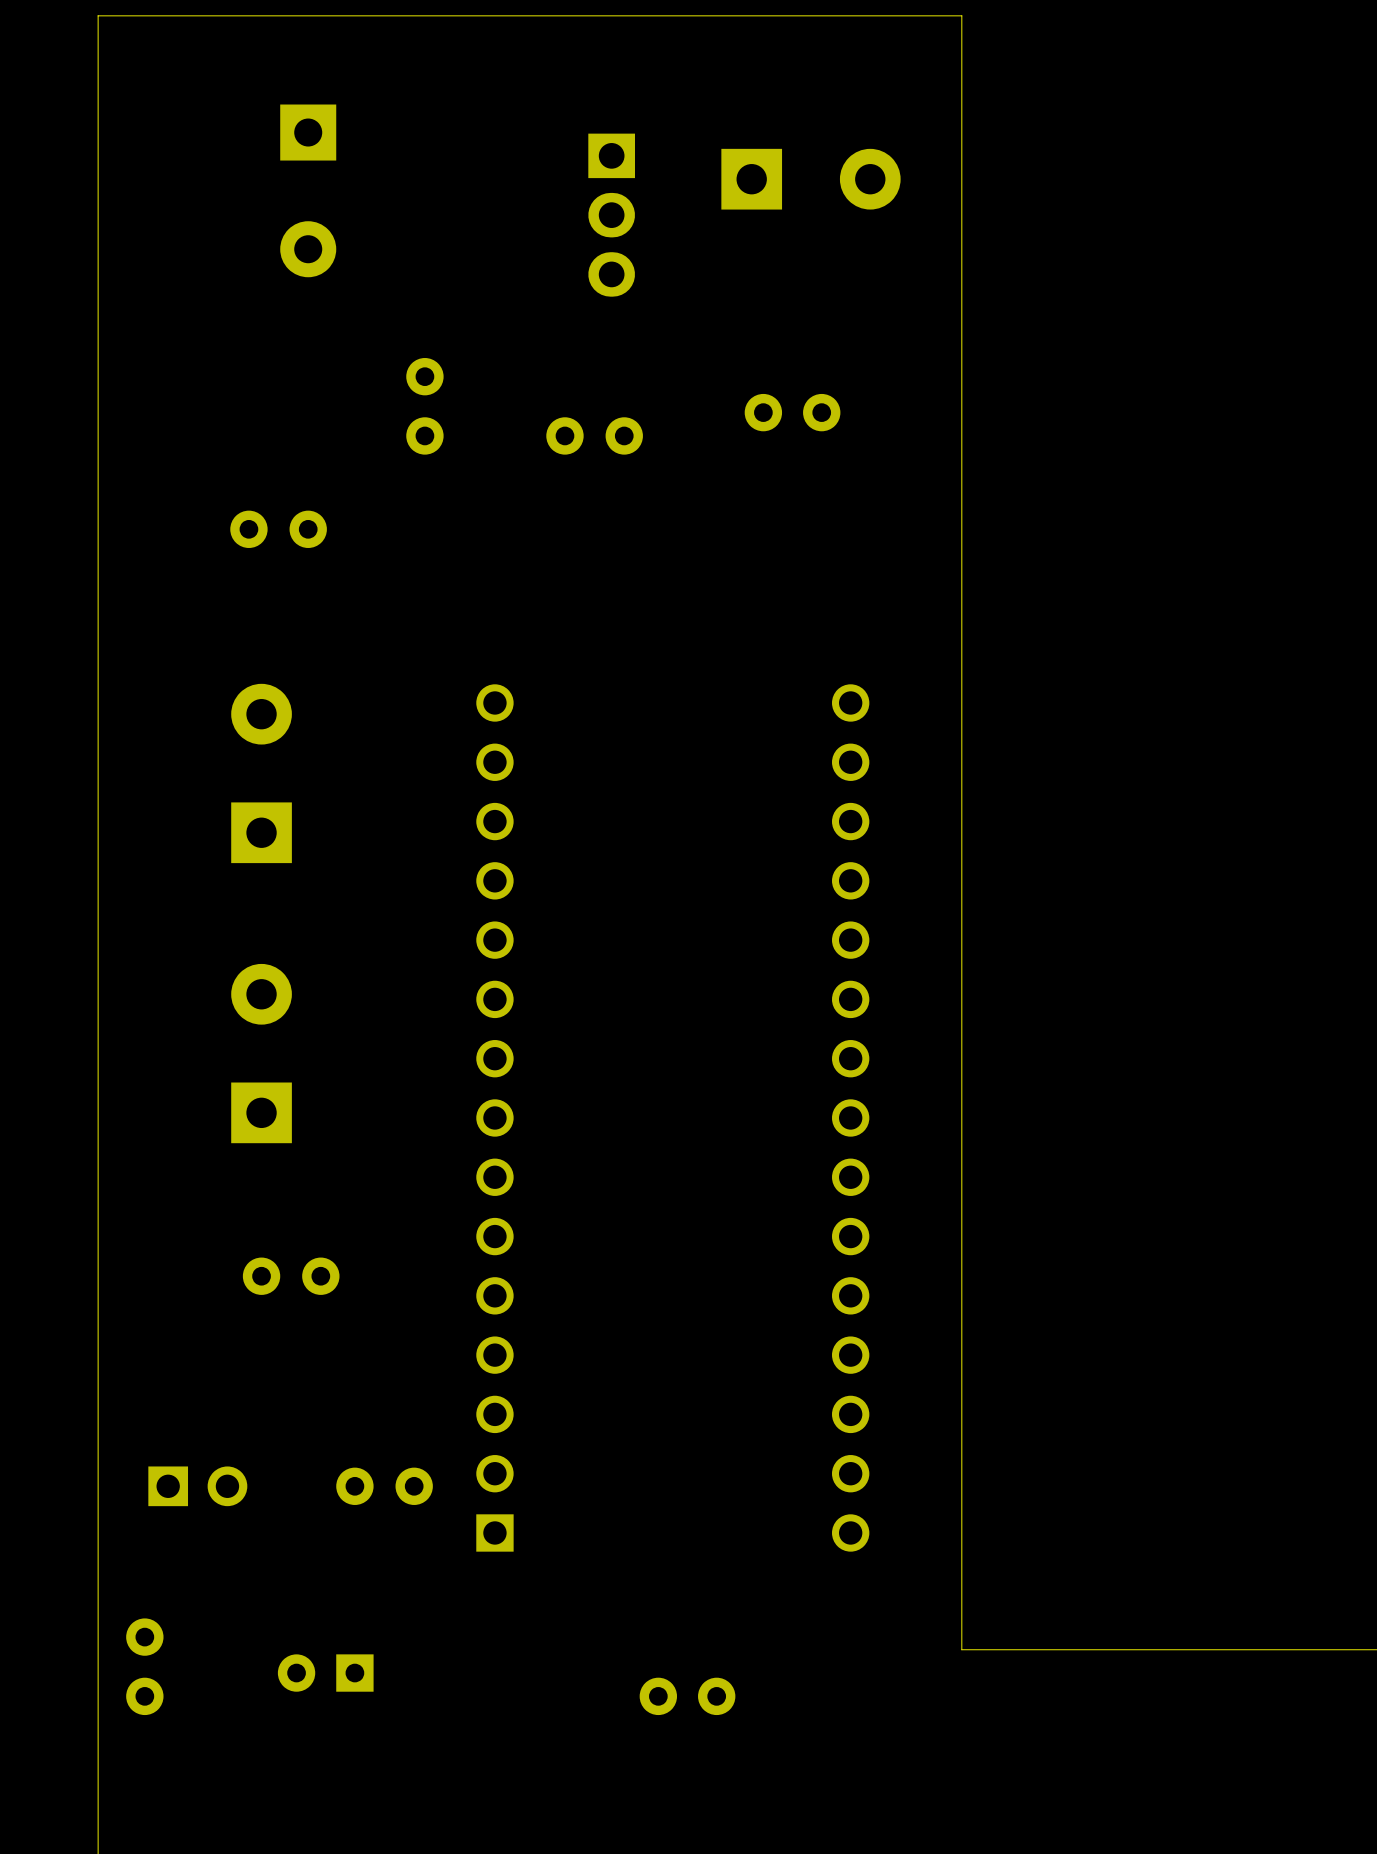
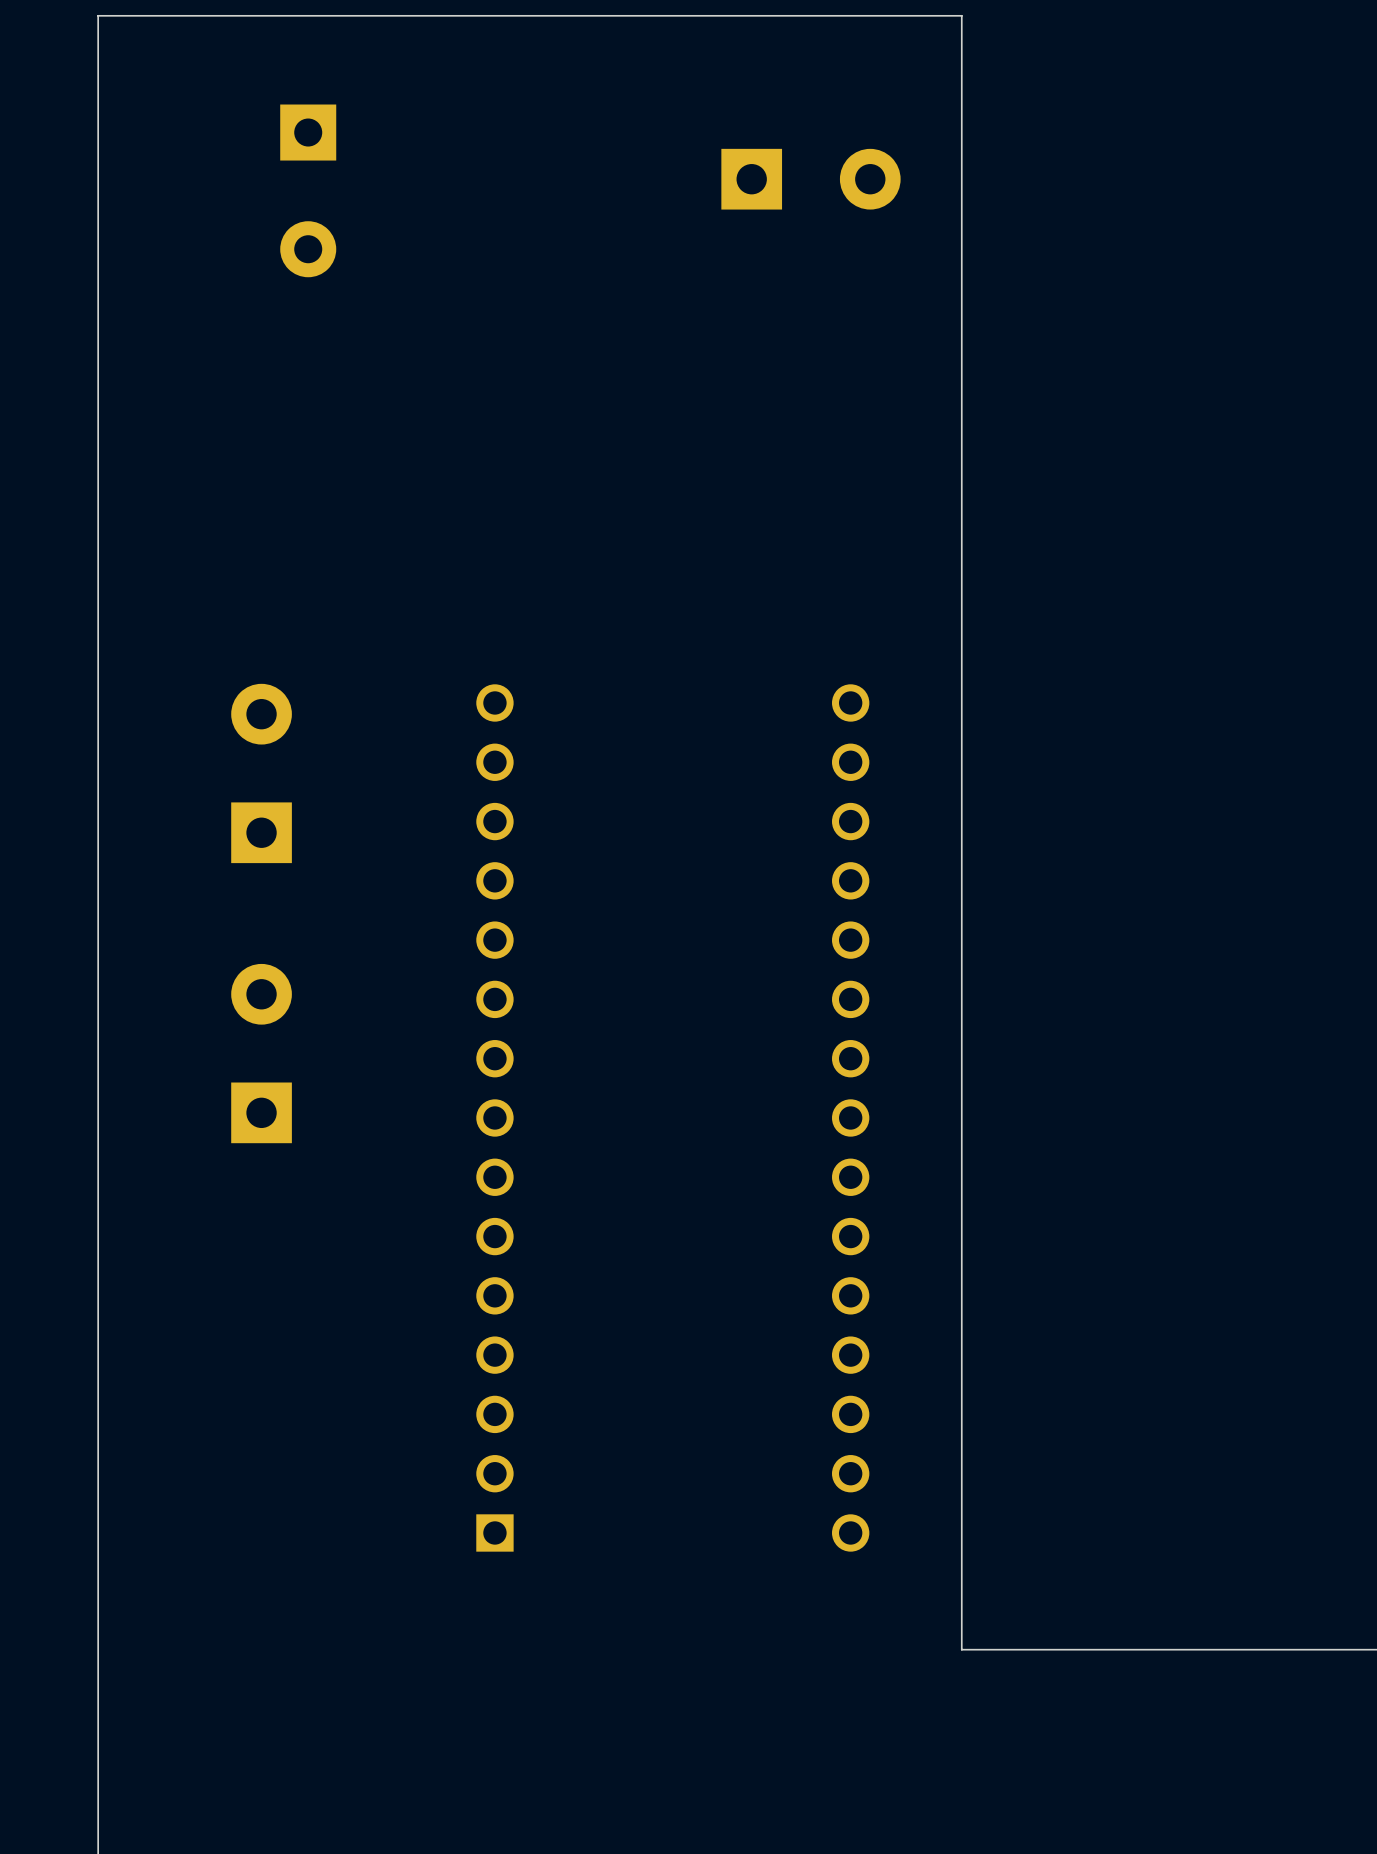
part: (611, 215) -> none
part: (424, 406) -> none
part: (792, 412) -> none
part: (594, 435) -> none
part: (278, 529) -> none
part: (291, 1276) -> none
part: (197, 1486) -> none
part: (384, 1486) -> none
part: (144, 1666) -> none
part: (325, 1673) -> none
part: (687, 1696) -> none

